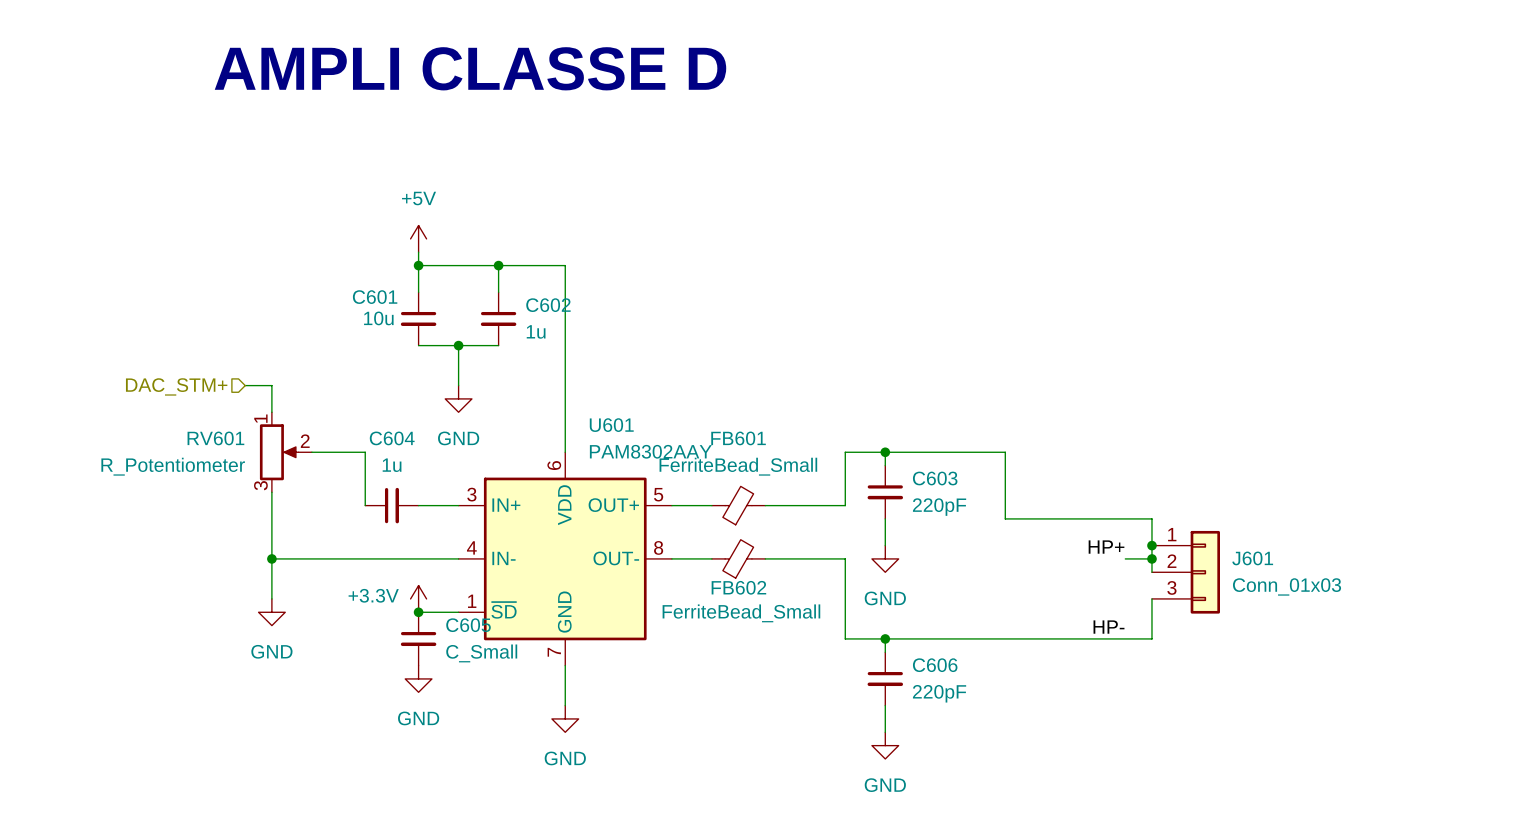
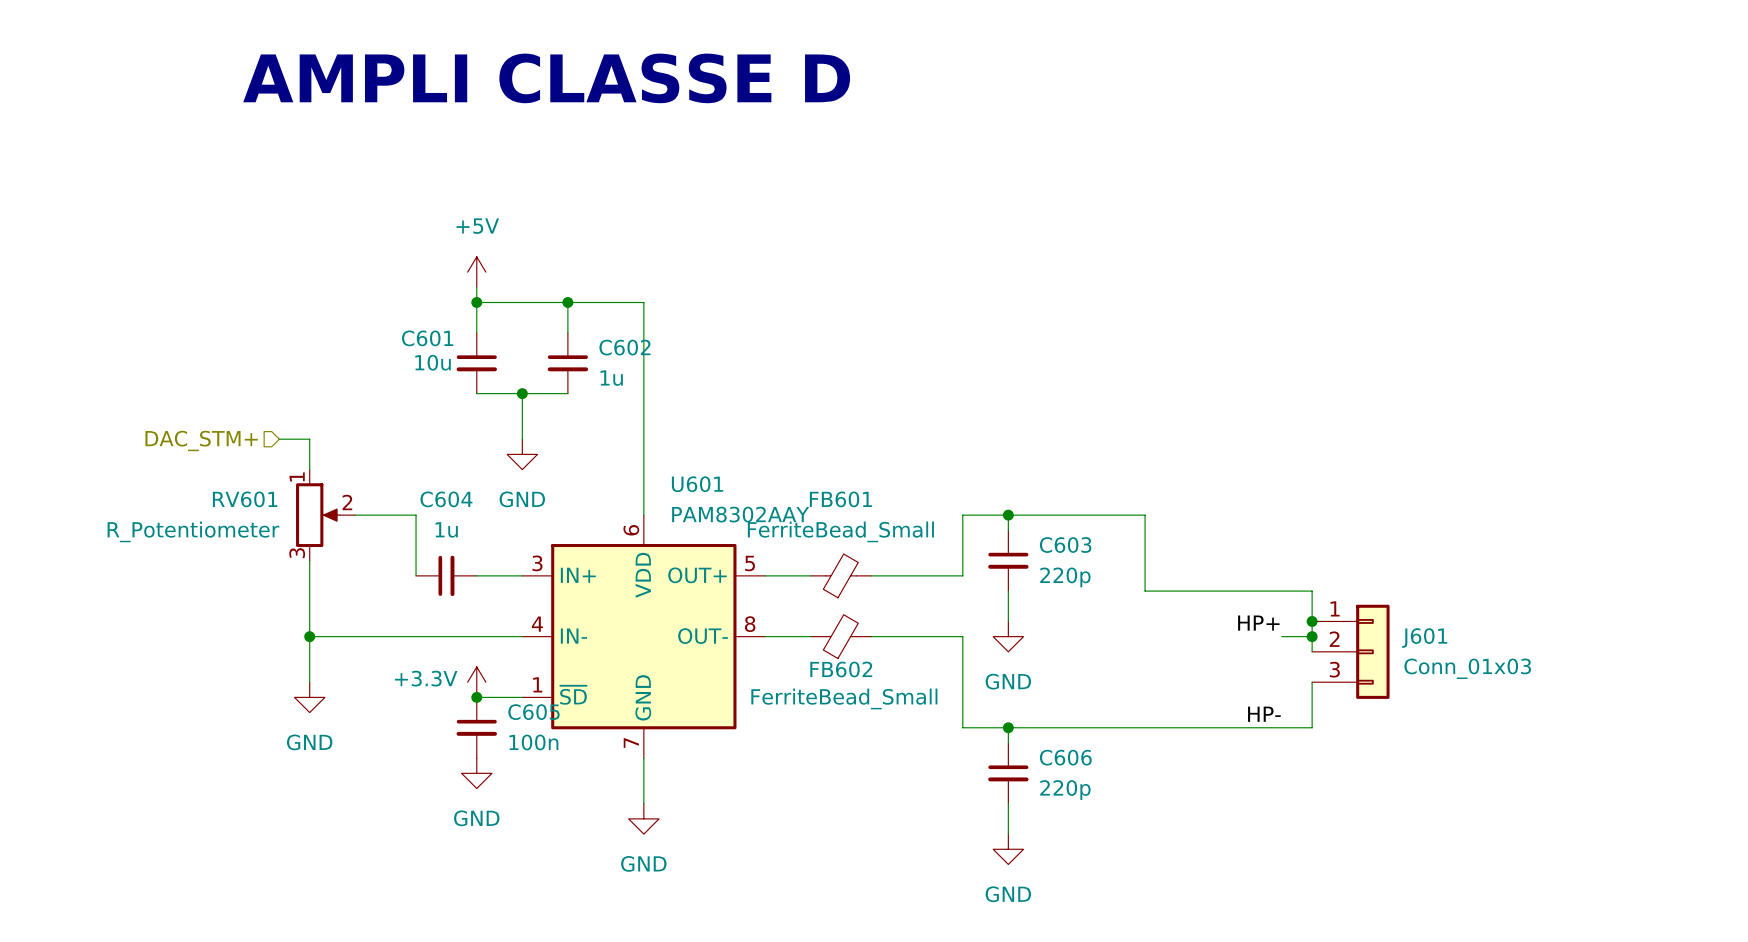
C603 value: 220pF (939, 507) -> 220p (1065, 577)
C605 value: C_Small (481, 653) -> 100n (533, 742)
C606 value: 220pF (939, 693) -> 220p (1065, 790)

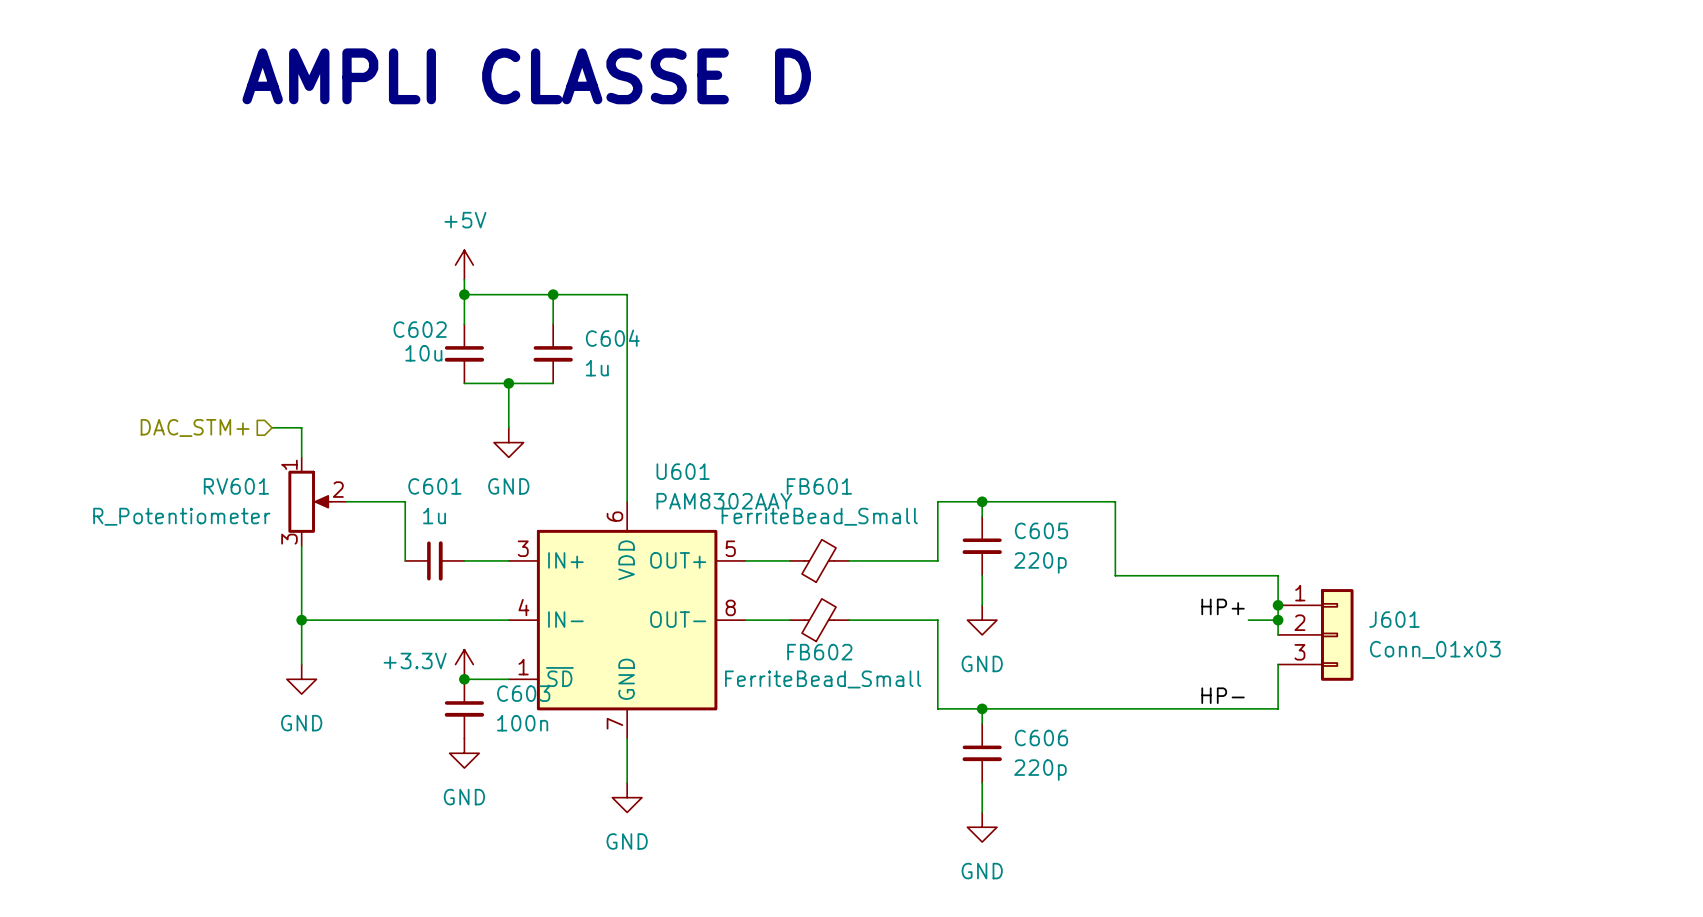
C601 name: C601 (427, 338) -> C602 (420, 329)
C602 name: C602 (624, 347) -> C604 (612, 338)
C604 name: C604 (446, 499) -> C601 (434, 486)
C603 name: C603 (1065, 545) -> C605 (1041, 530)
C605 name: C605 (533, 712) -> C603 (523, 693)

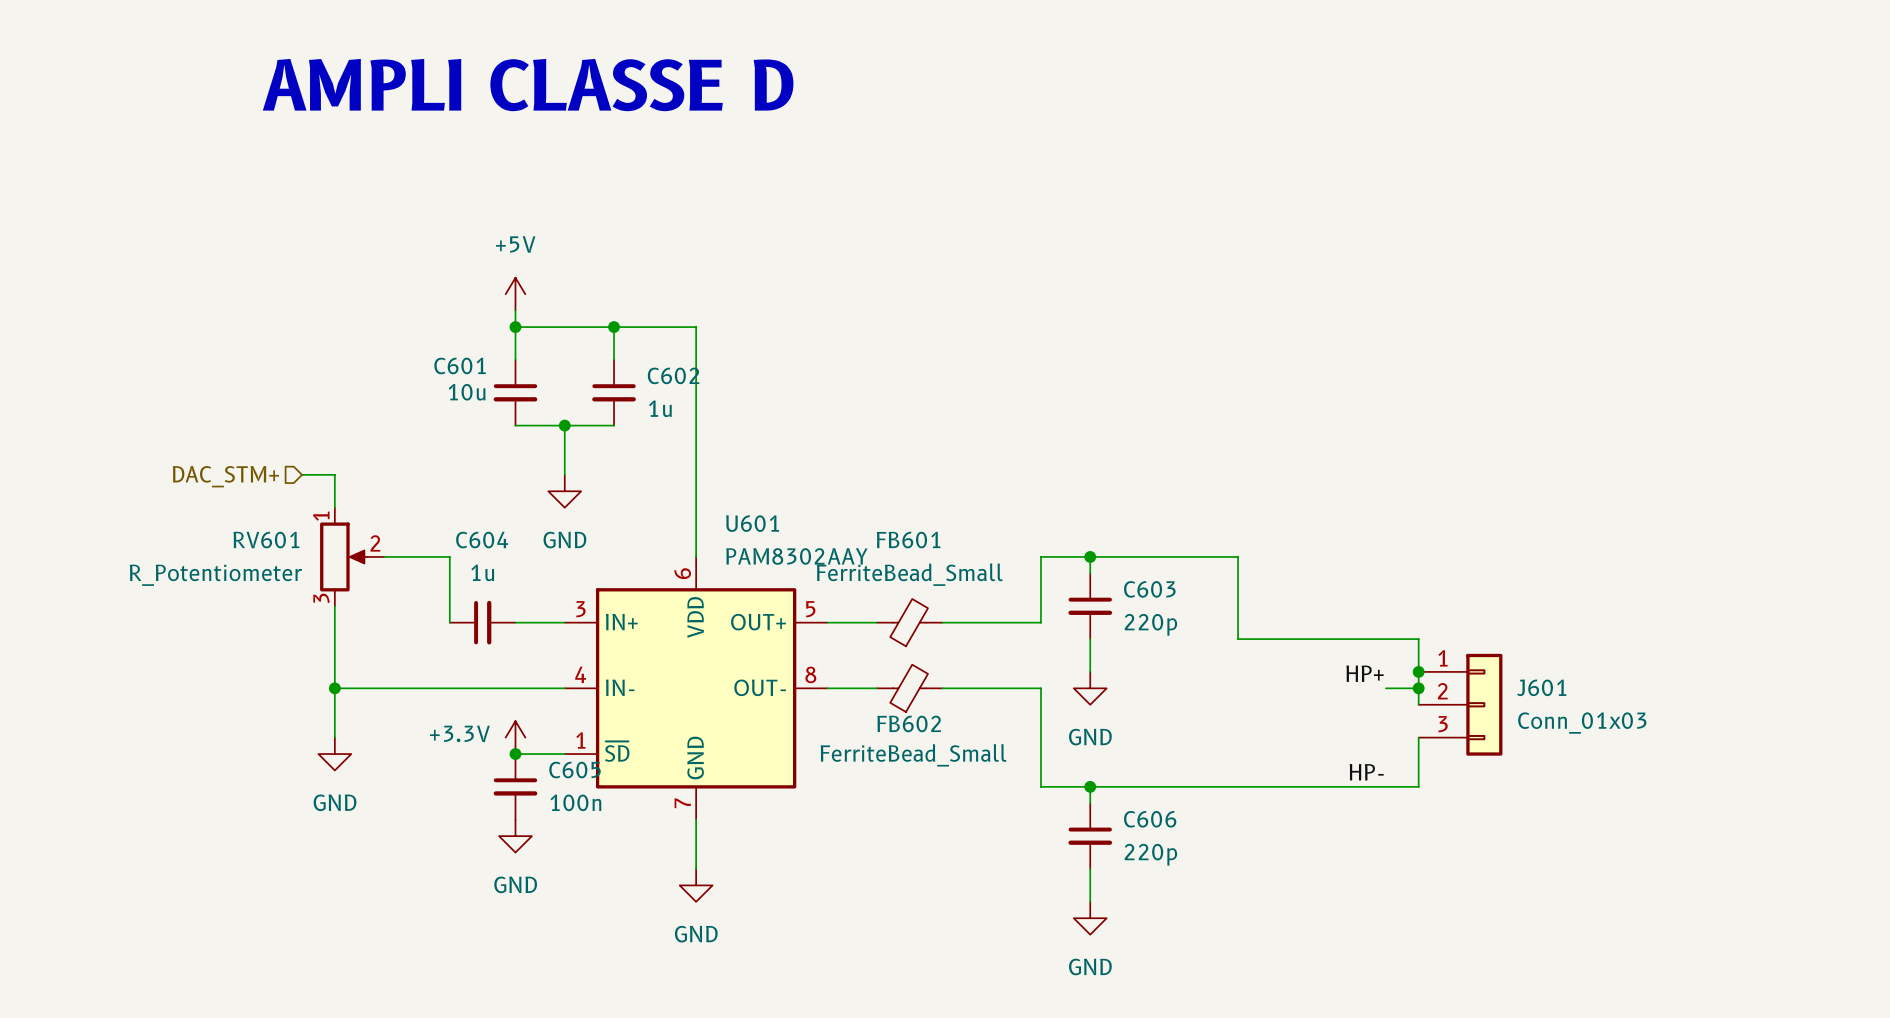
C602 name: C602 (420, 329) -> C601 (460, 365)
C604 name: C604 (612, 338) -> C602 (673, 375)
C601 name: C601 (434, 486) -> C604 (482, 540)
C605 name: C605 (1041, 530) -> C603 (1149, 589)
C603 name: C603 (523, 693) -> C605 (575, 770)

